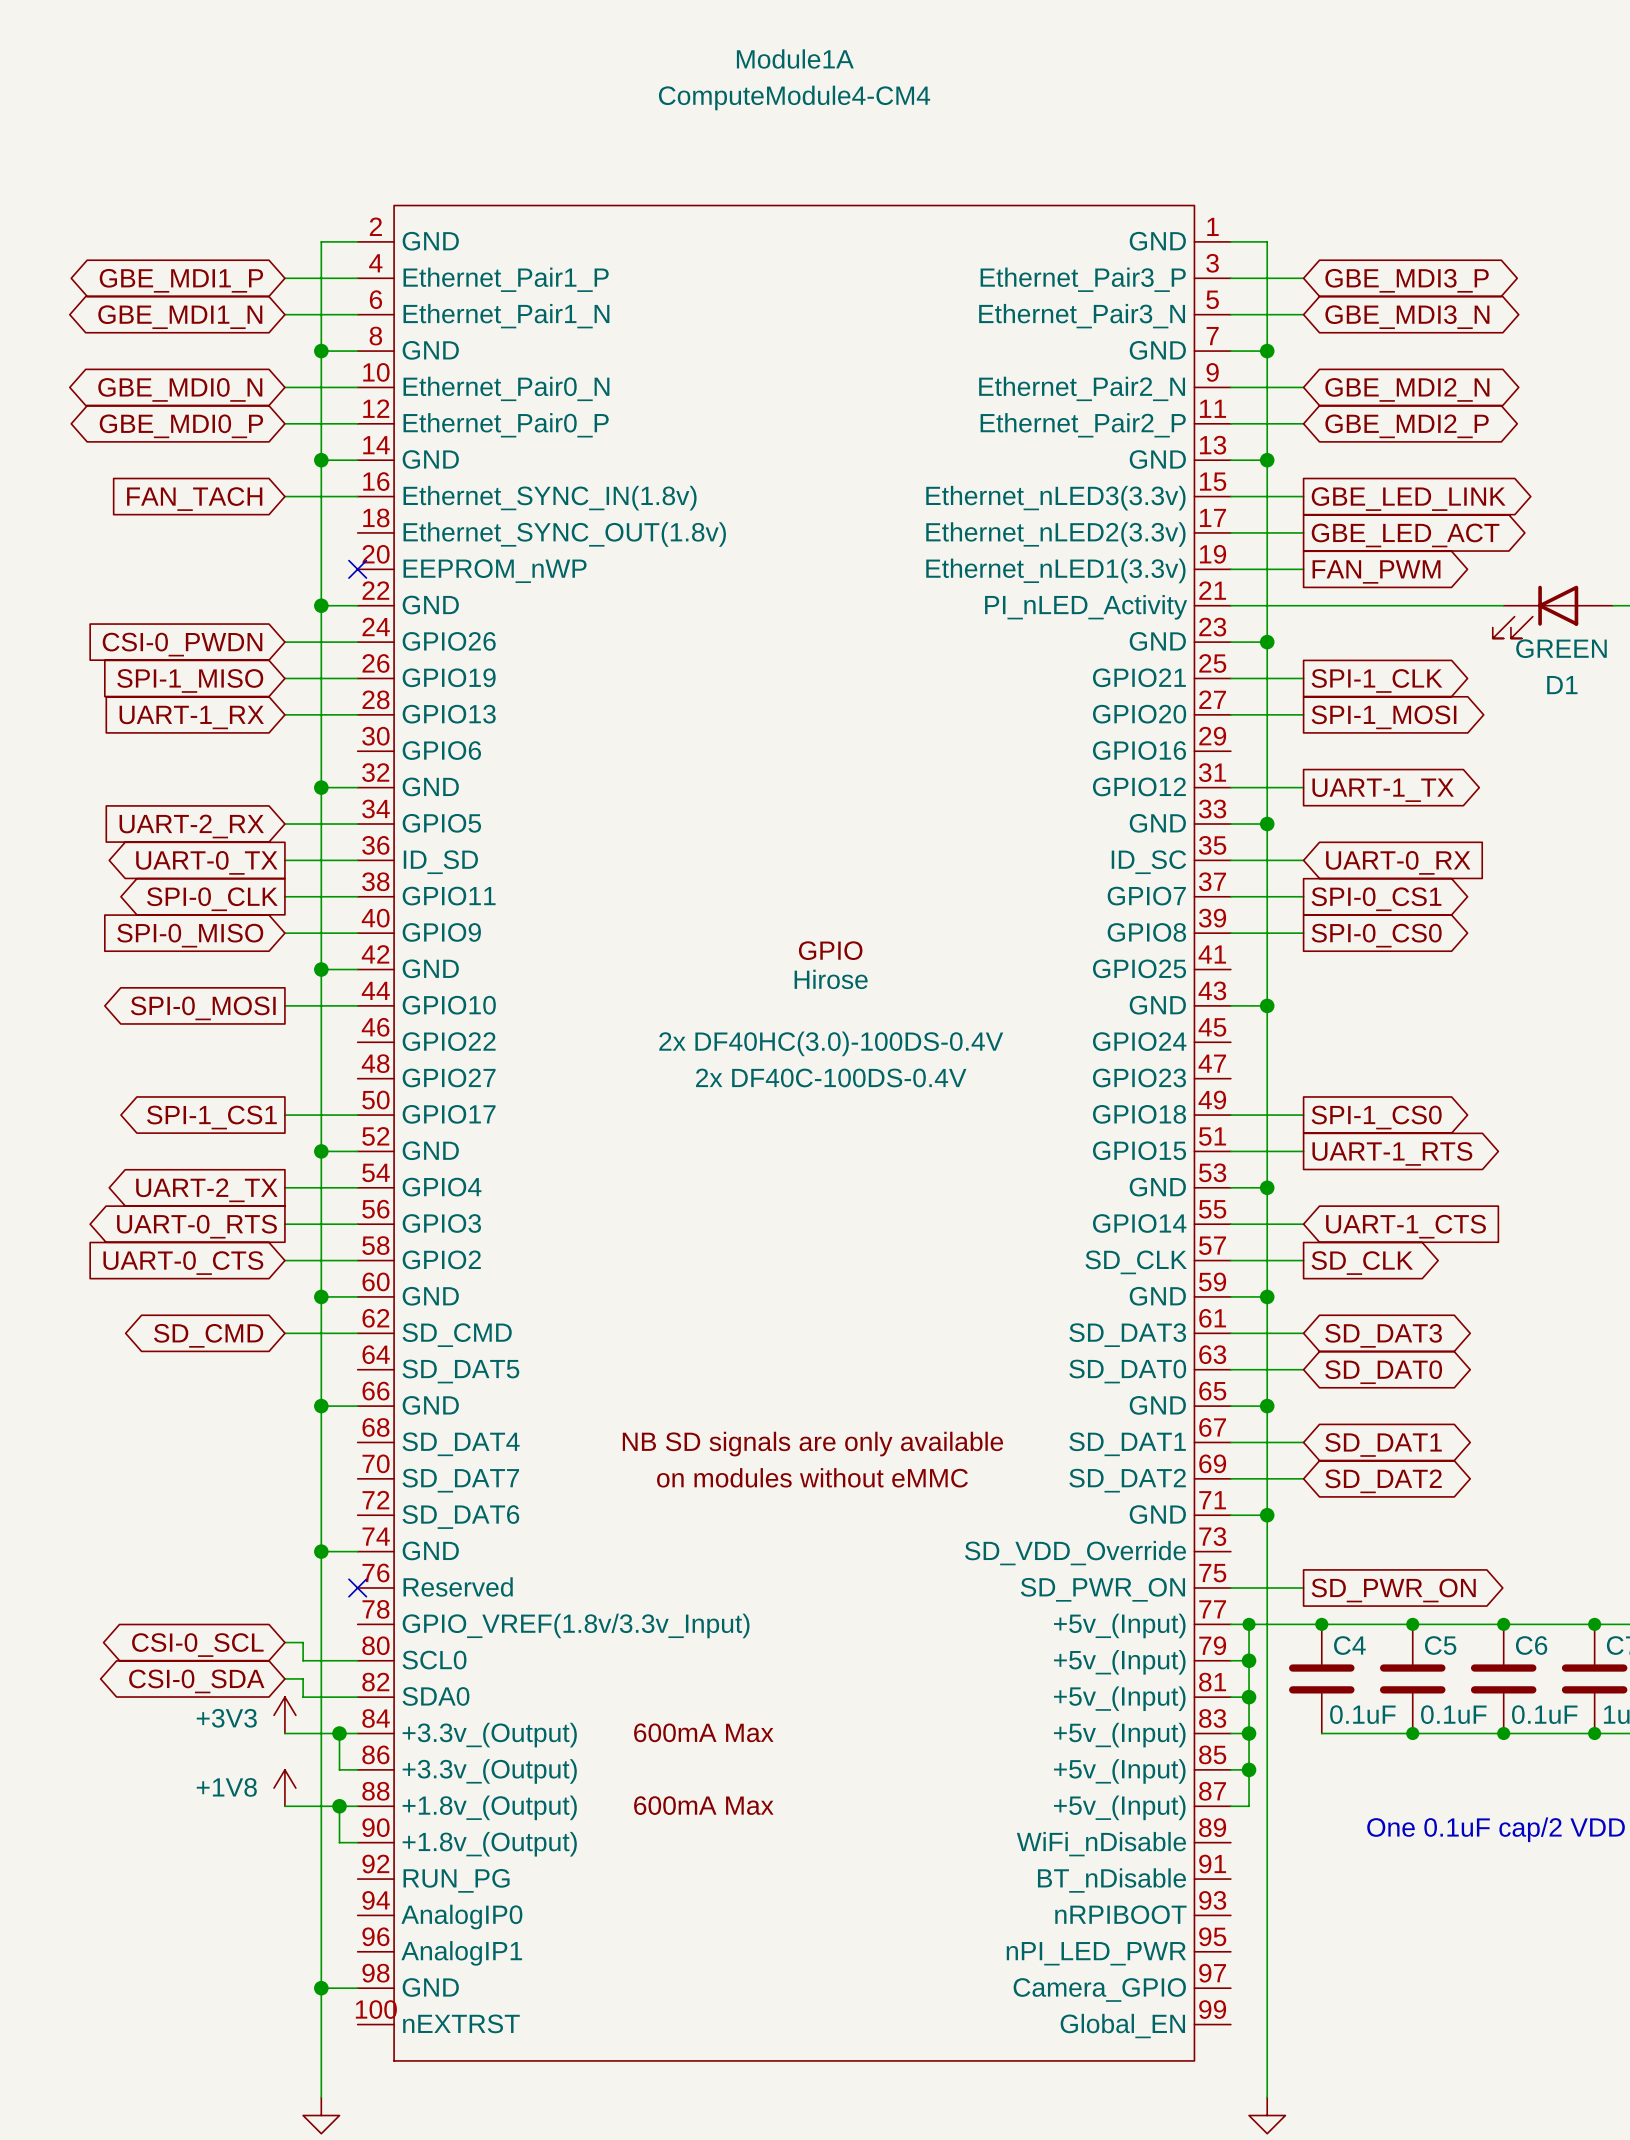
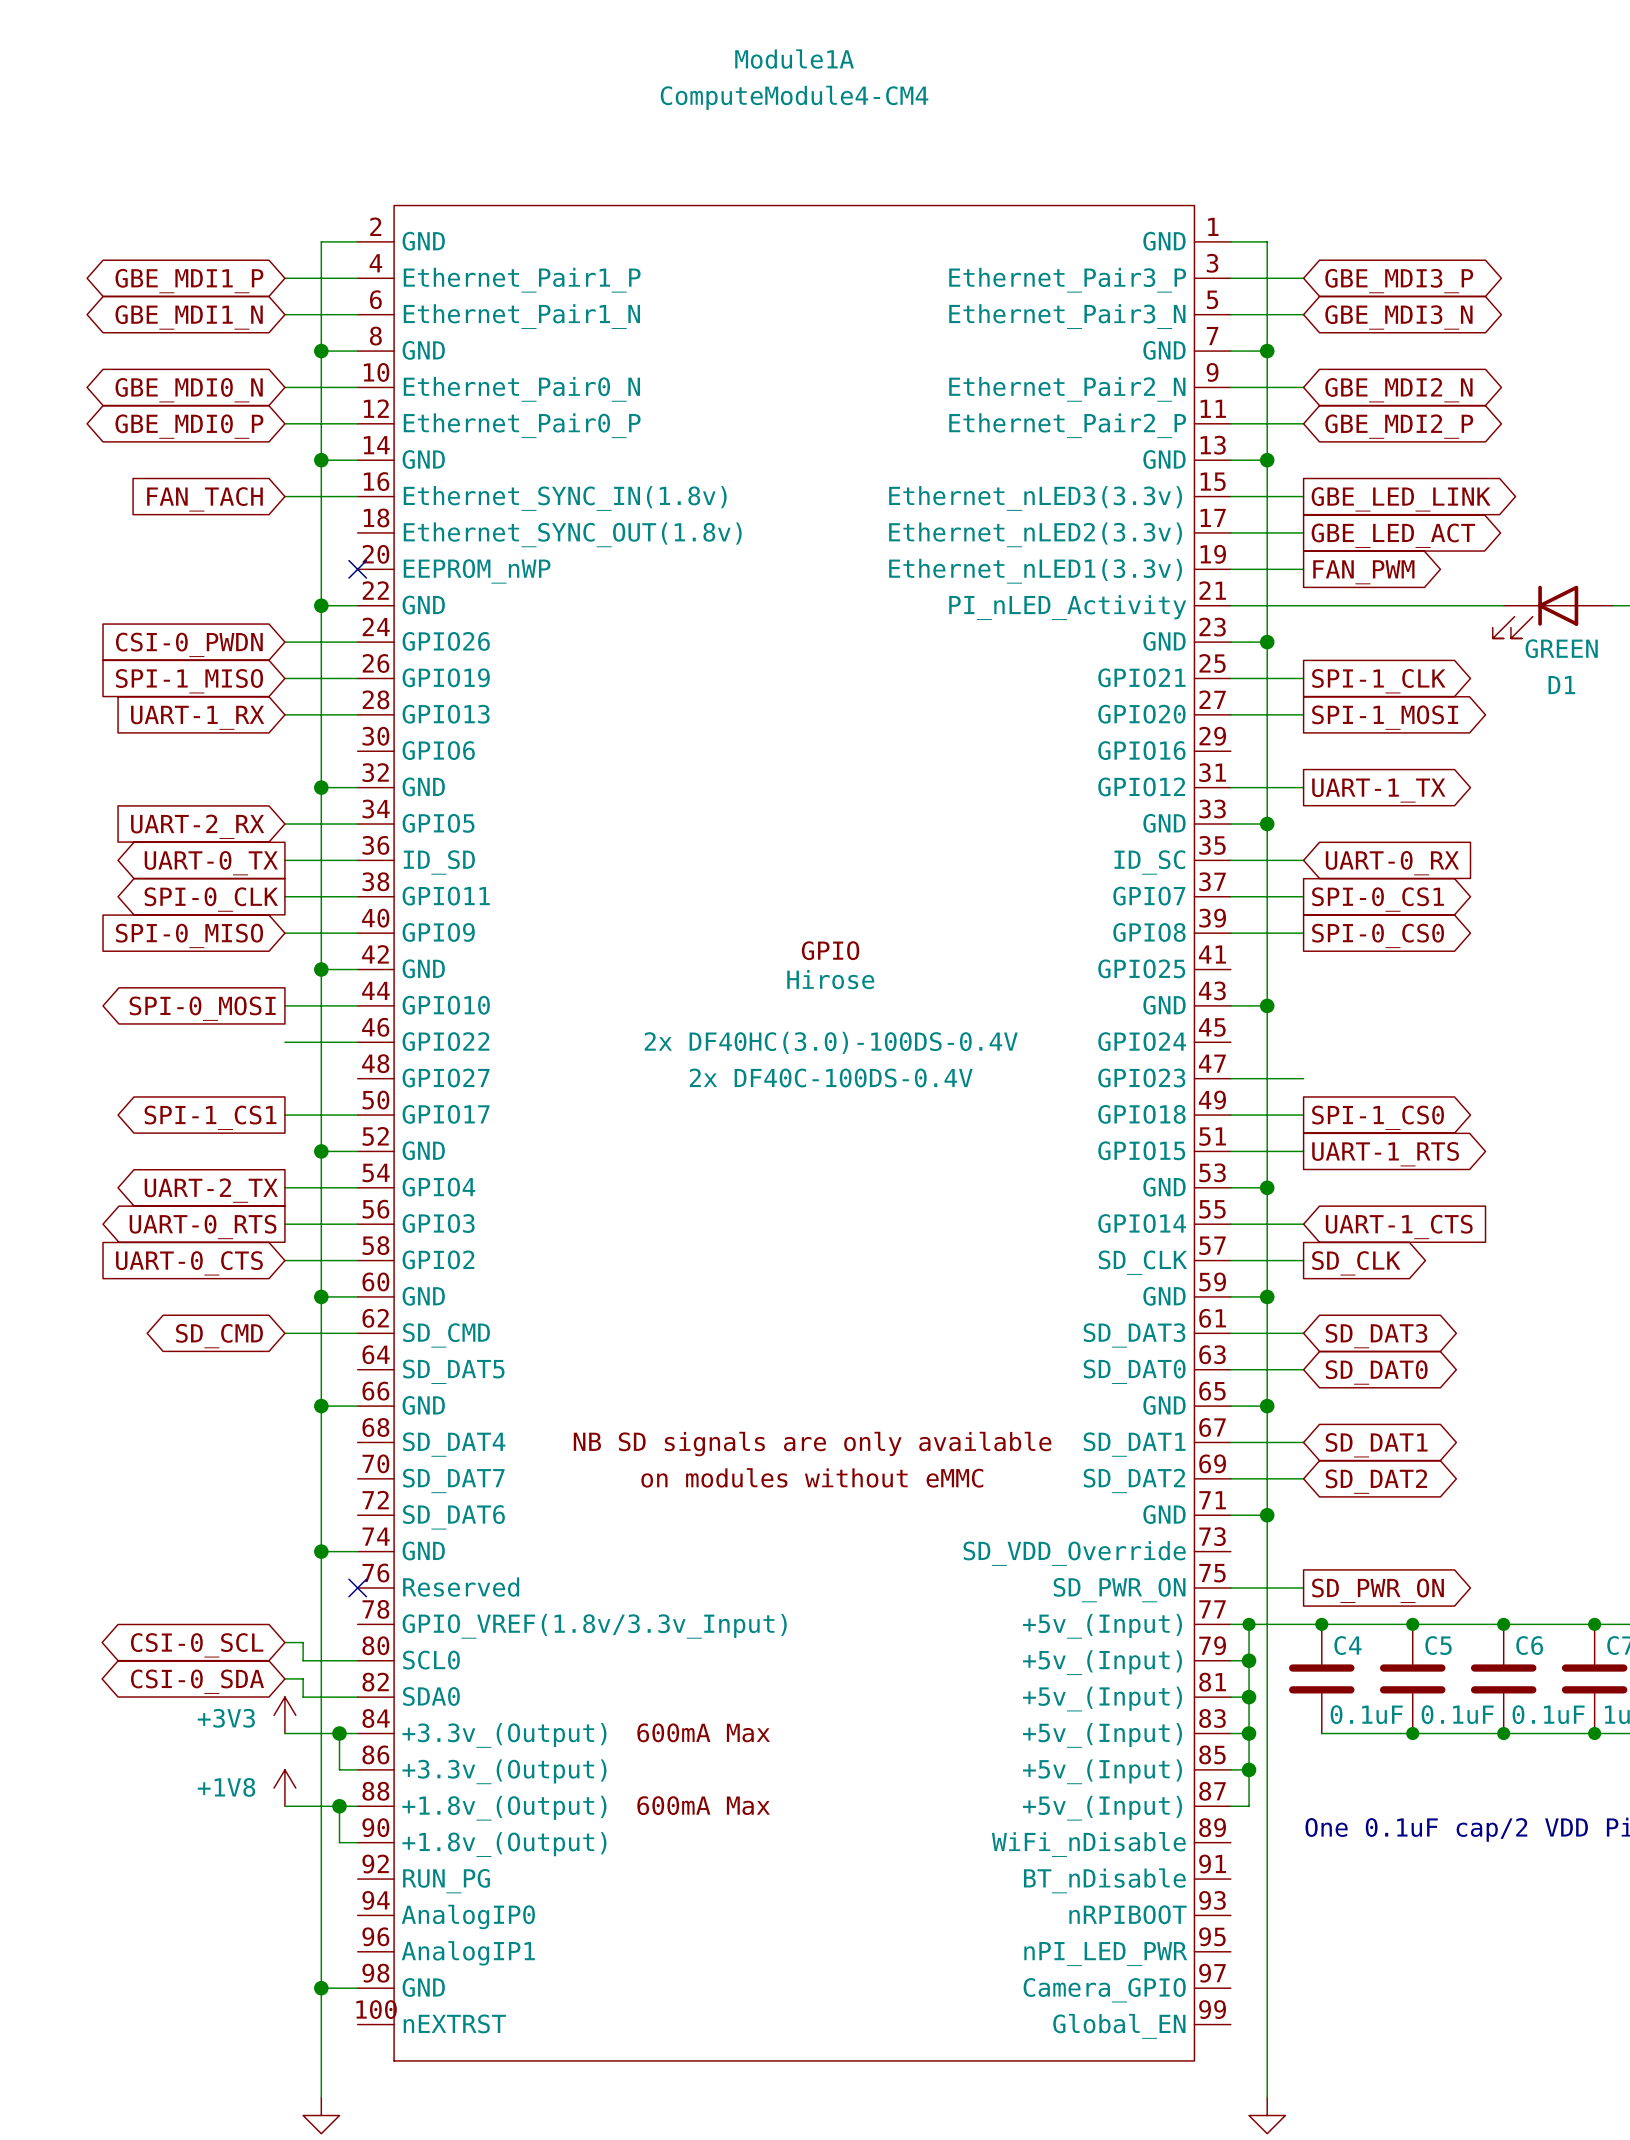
wire: none -> (284, 1042) (357, 1042)
wire: none -> (1230, 1078) (1303, 1078)

